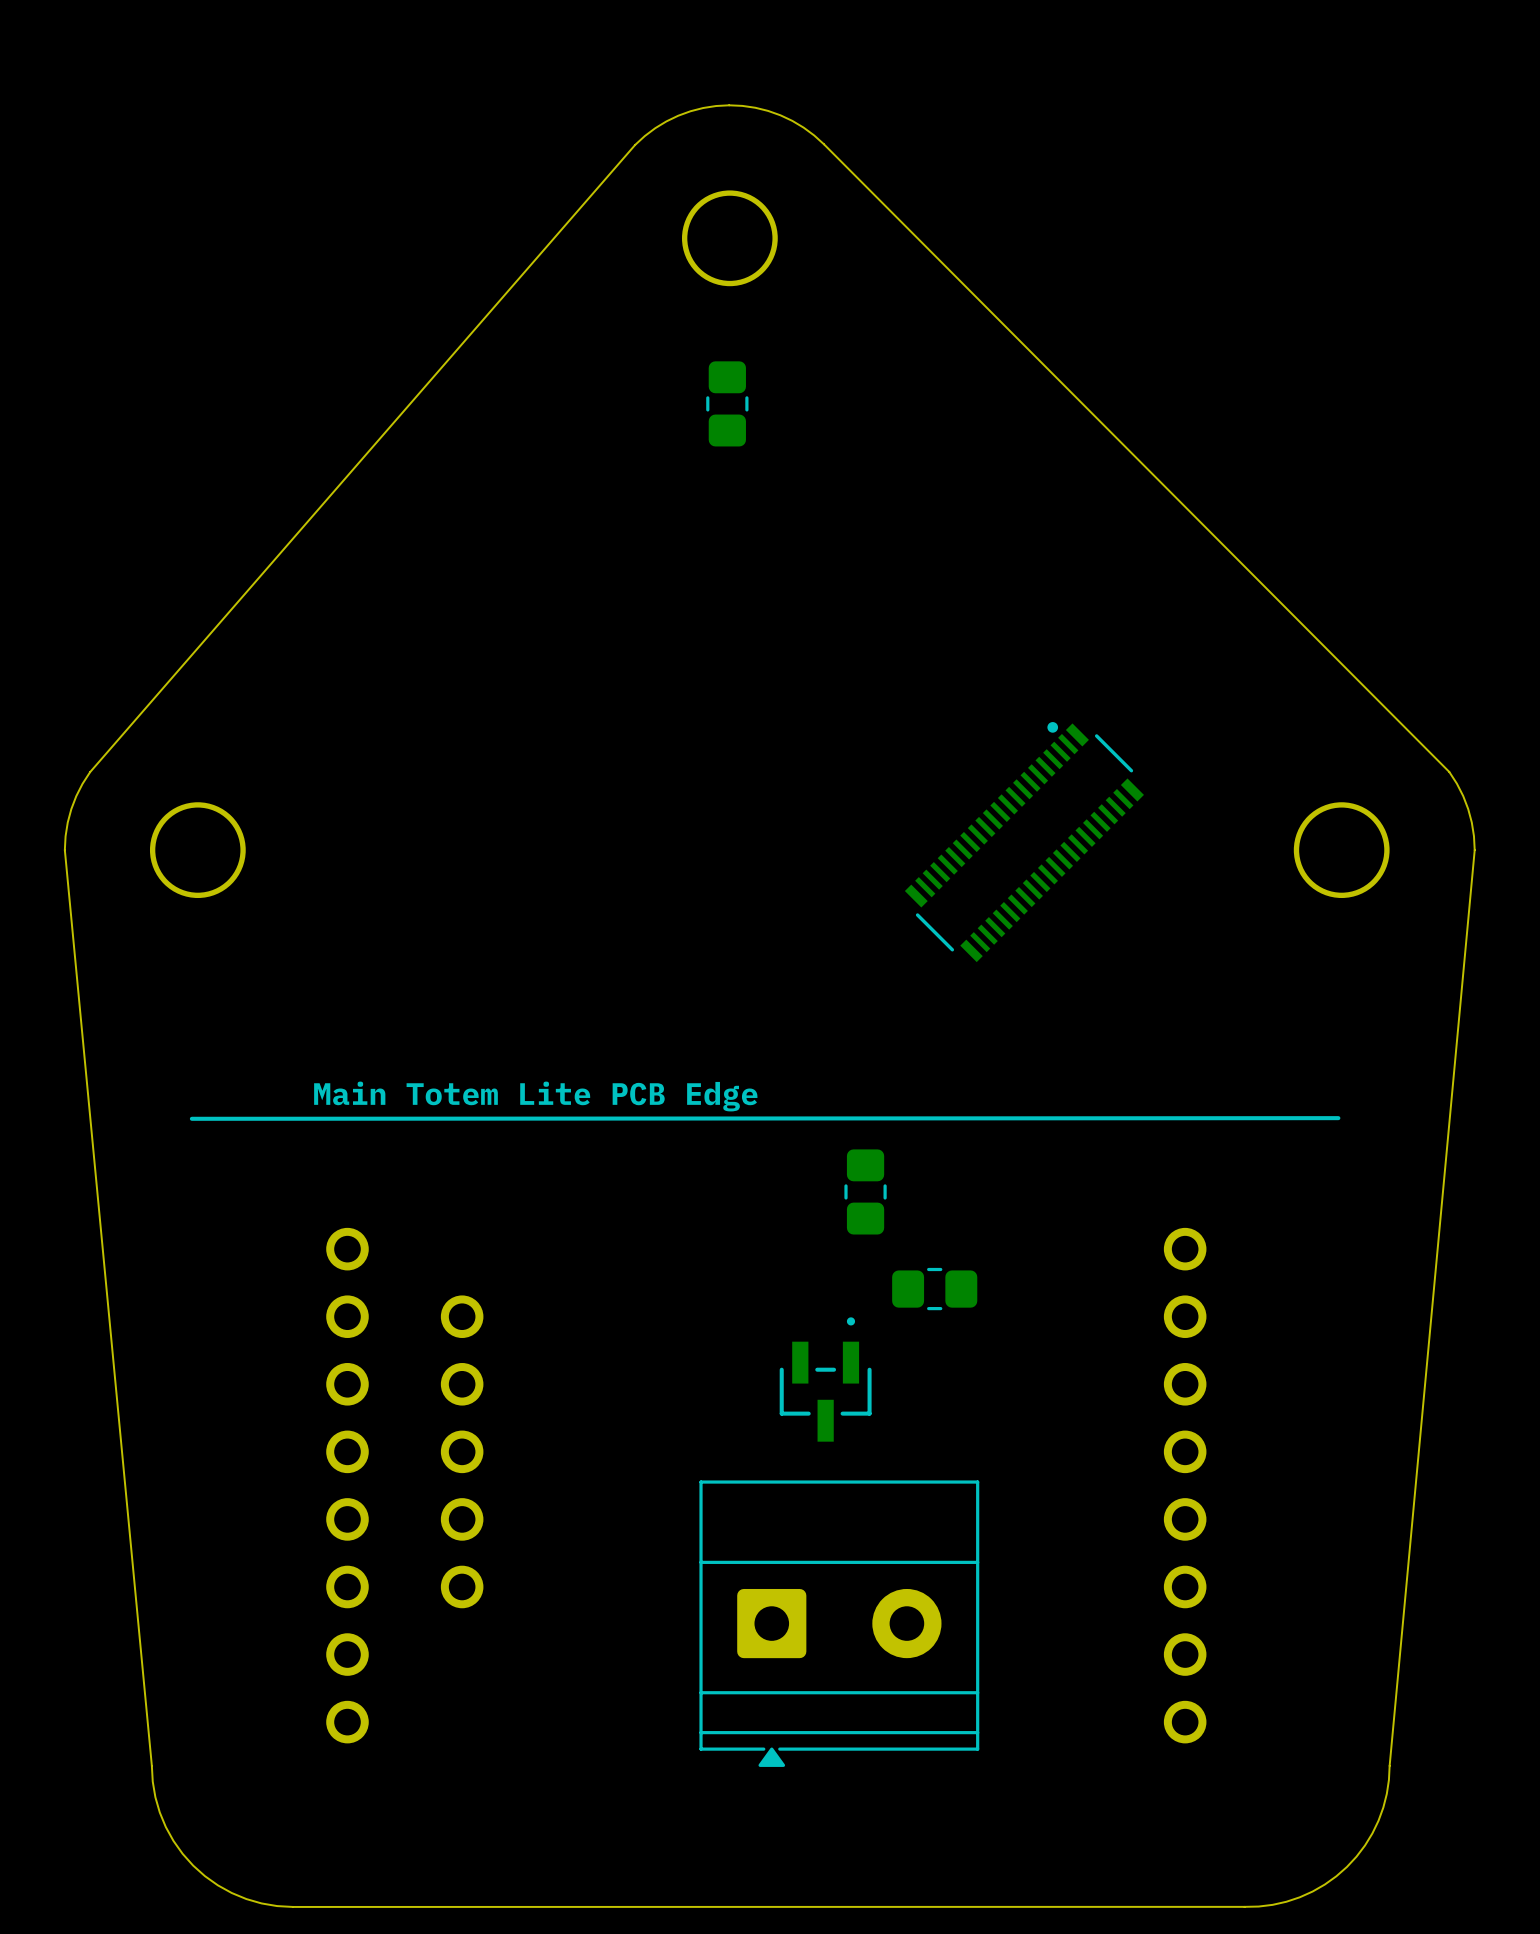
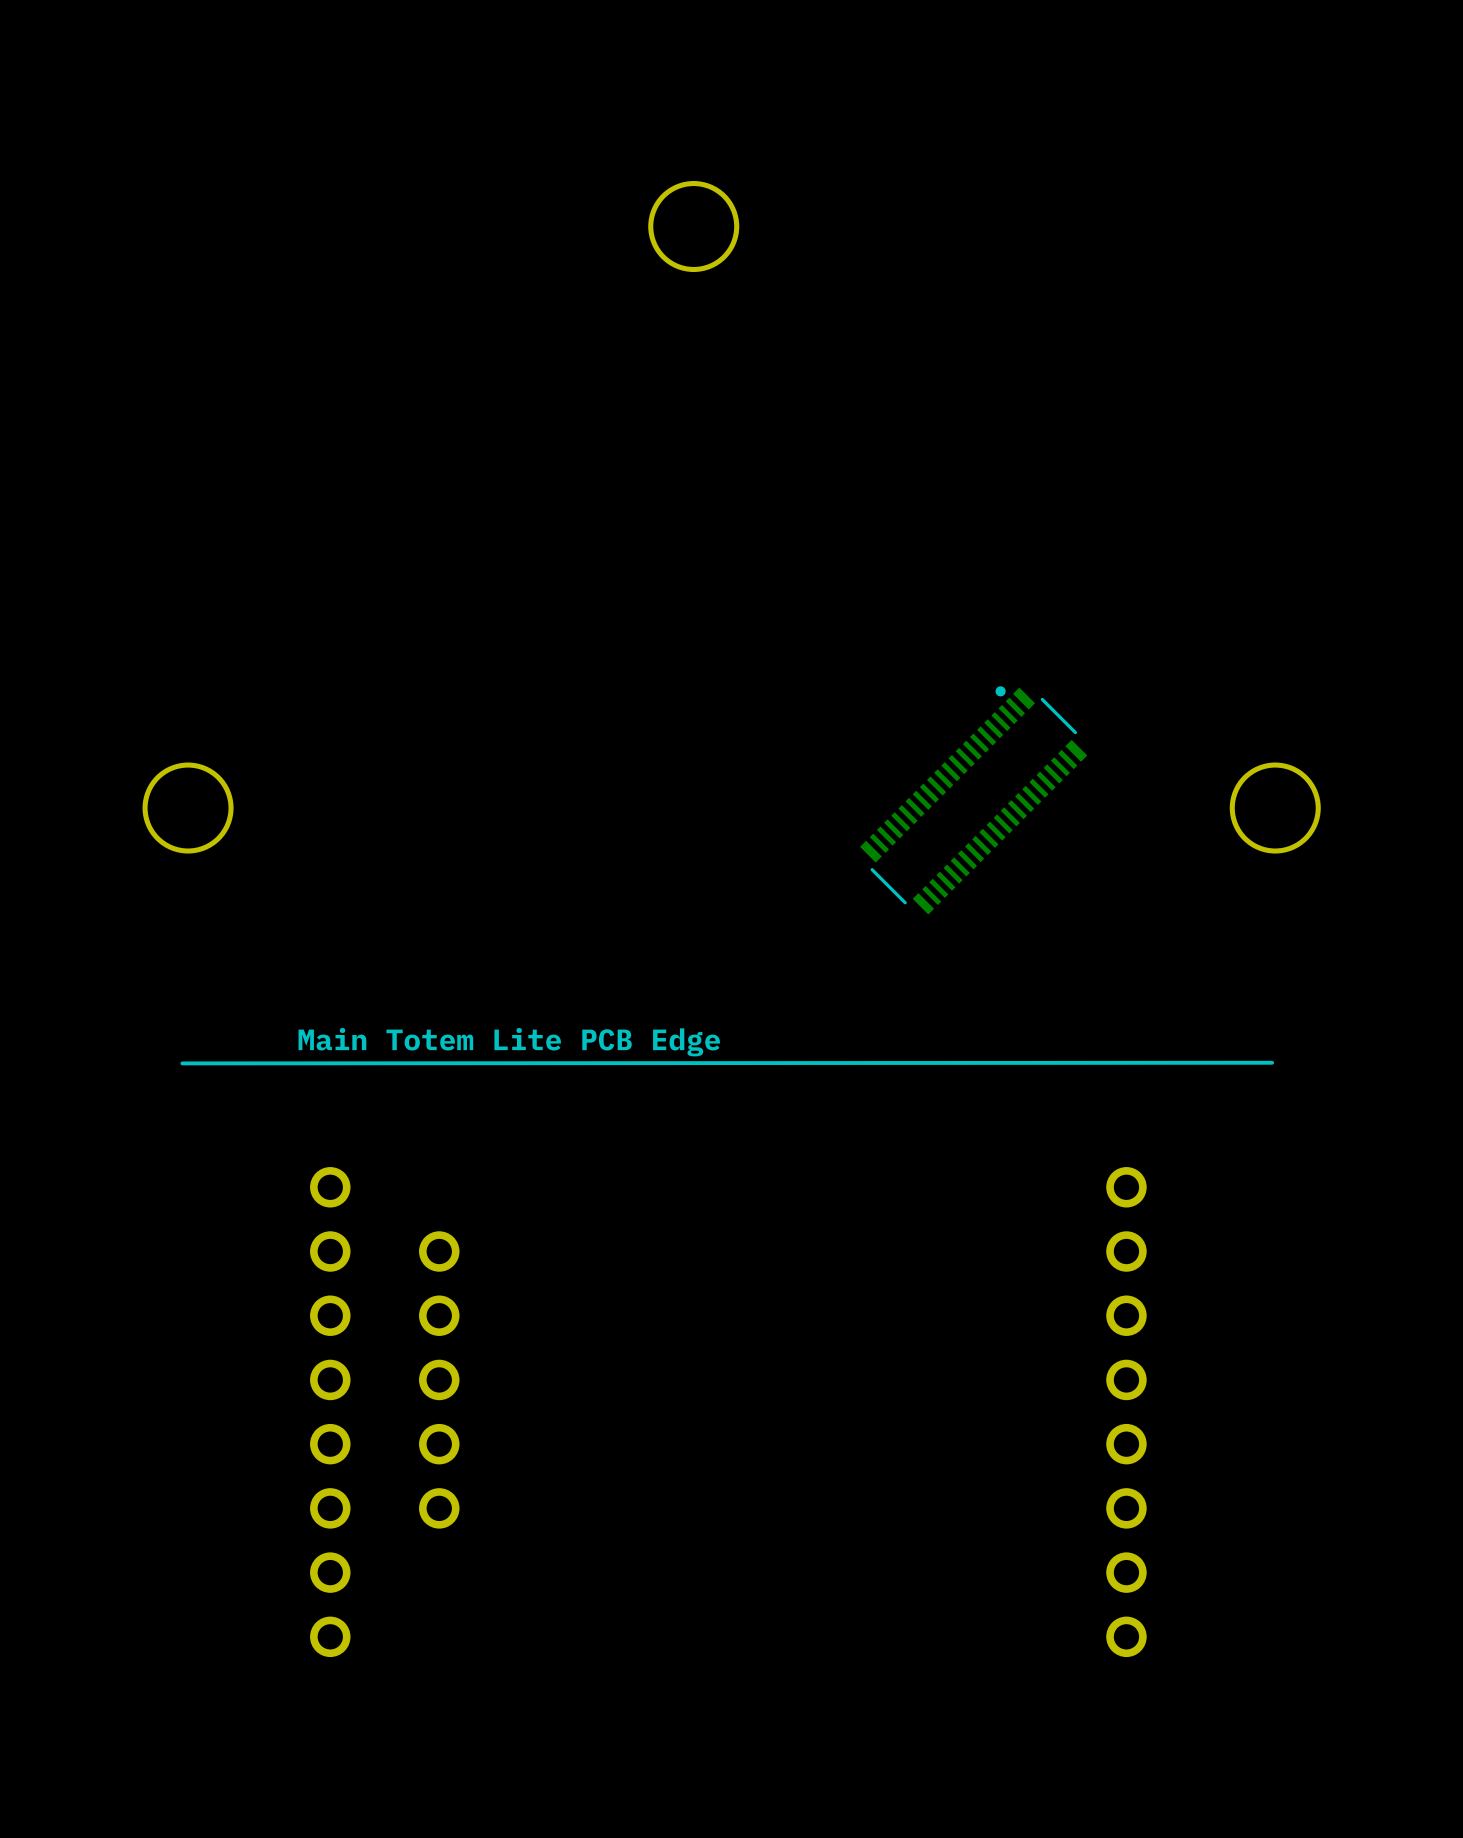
board edge: (729, 105) (703, 108) (678, 115) (655, 128) (635, 144) (90, 772) (71, 809) (64, 850) (152, 1781) (159, 1812) (165, 1827) (182, 1853) (204, 1876) (217, 1885) (246, 1899) (277, 1906) (1244, 1906) (1286, 1901) (1324, 1884) (1356, 1856) (1372, 1833) (1386, 1793) (1474, 850) (1468, 809) (1449, 771) (823, 144) (803, 127) (780, 115) (755, 107) (729, 105) -> none
part: (727, 403) -> none
part: (865, 1191) -> none
part: (934, 1289) -> none
part: (825, 1379) -> none
part: (839, 1623) -> none

